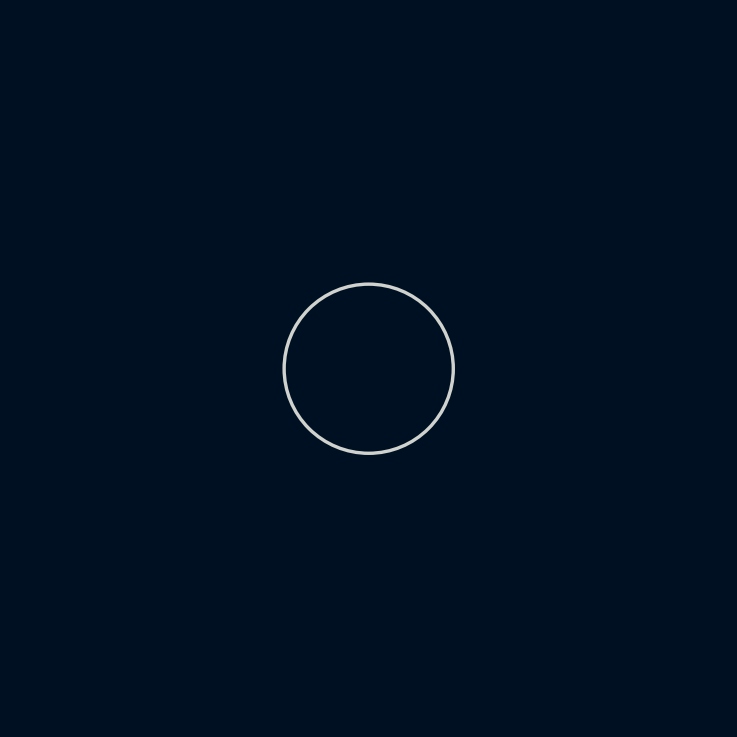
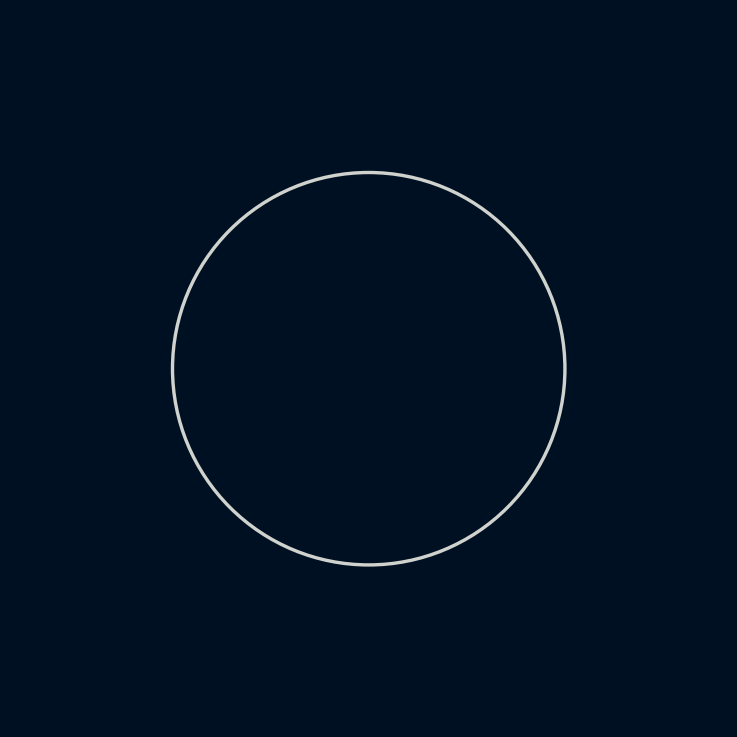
round board edge size: [282, 282, 455, 455] -> [170, 170, 567, 567]

